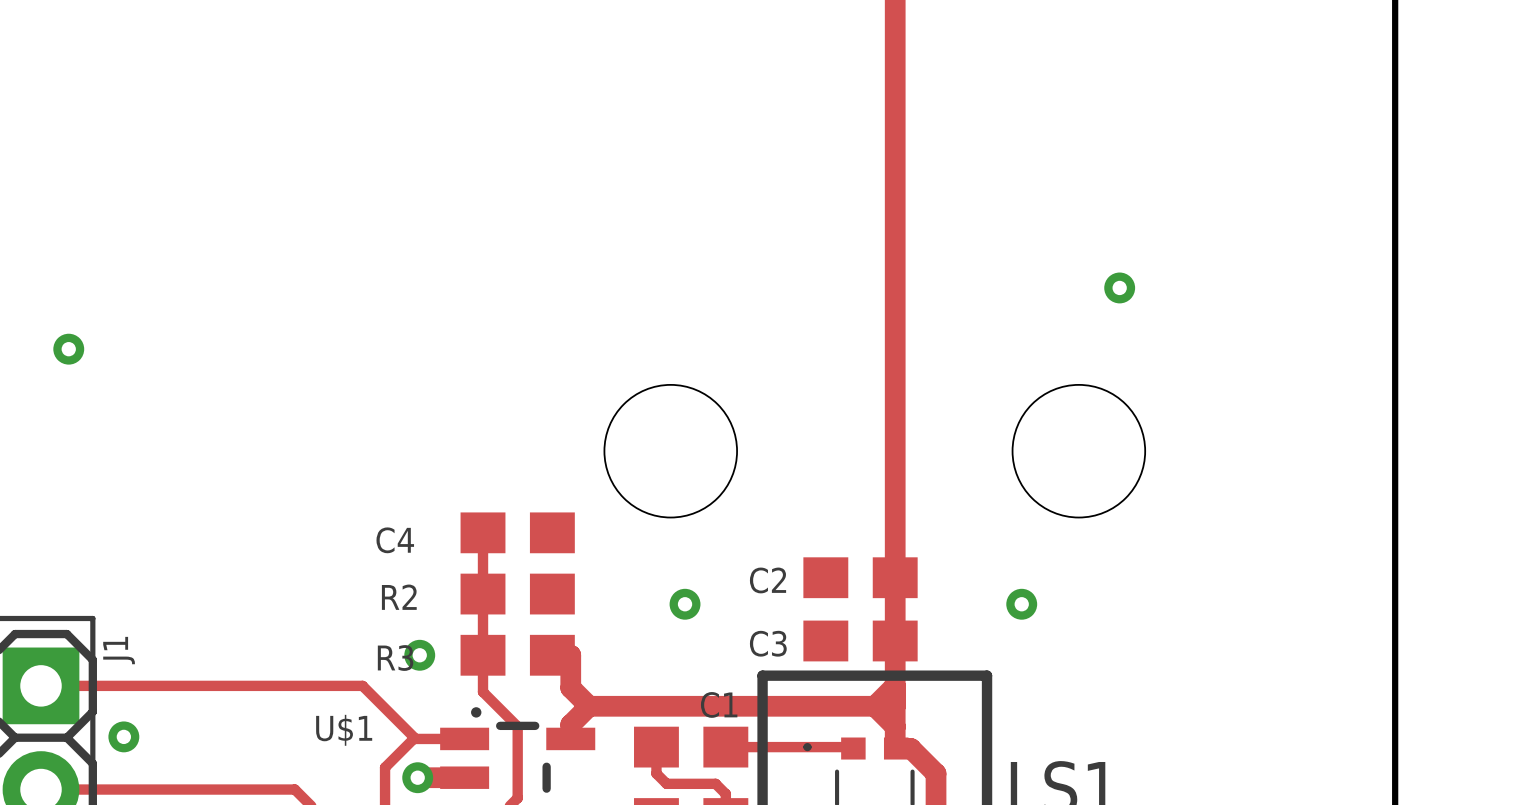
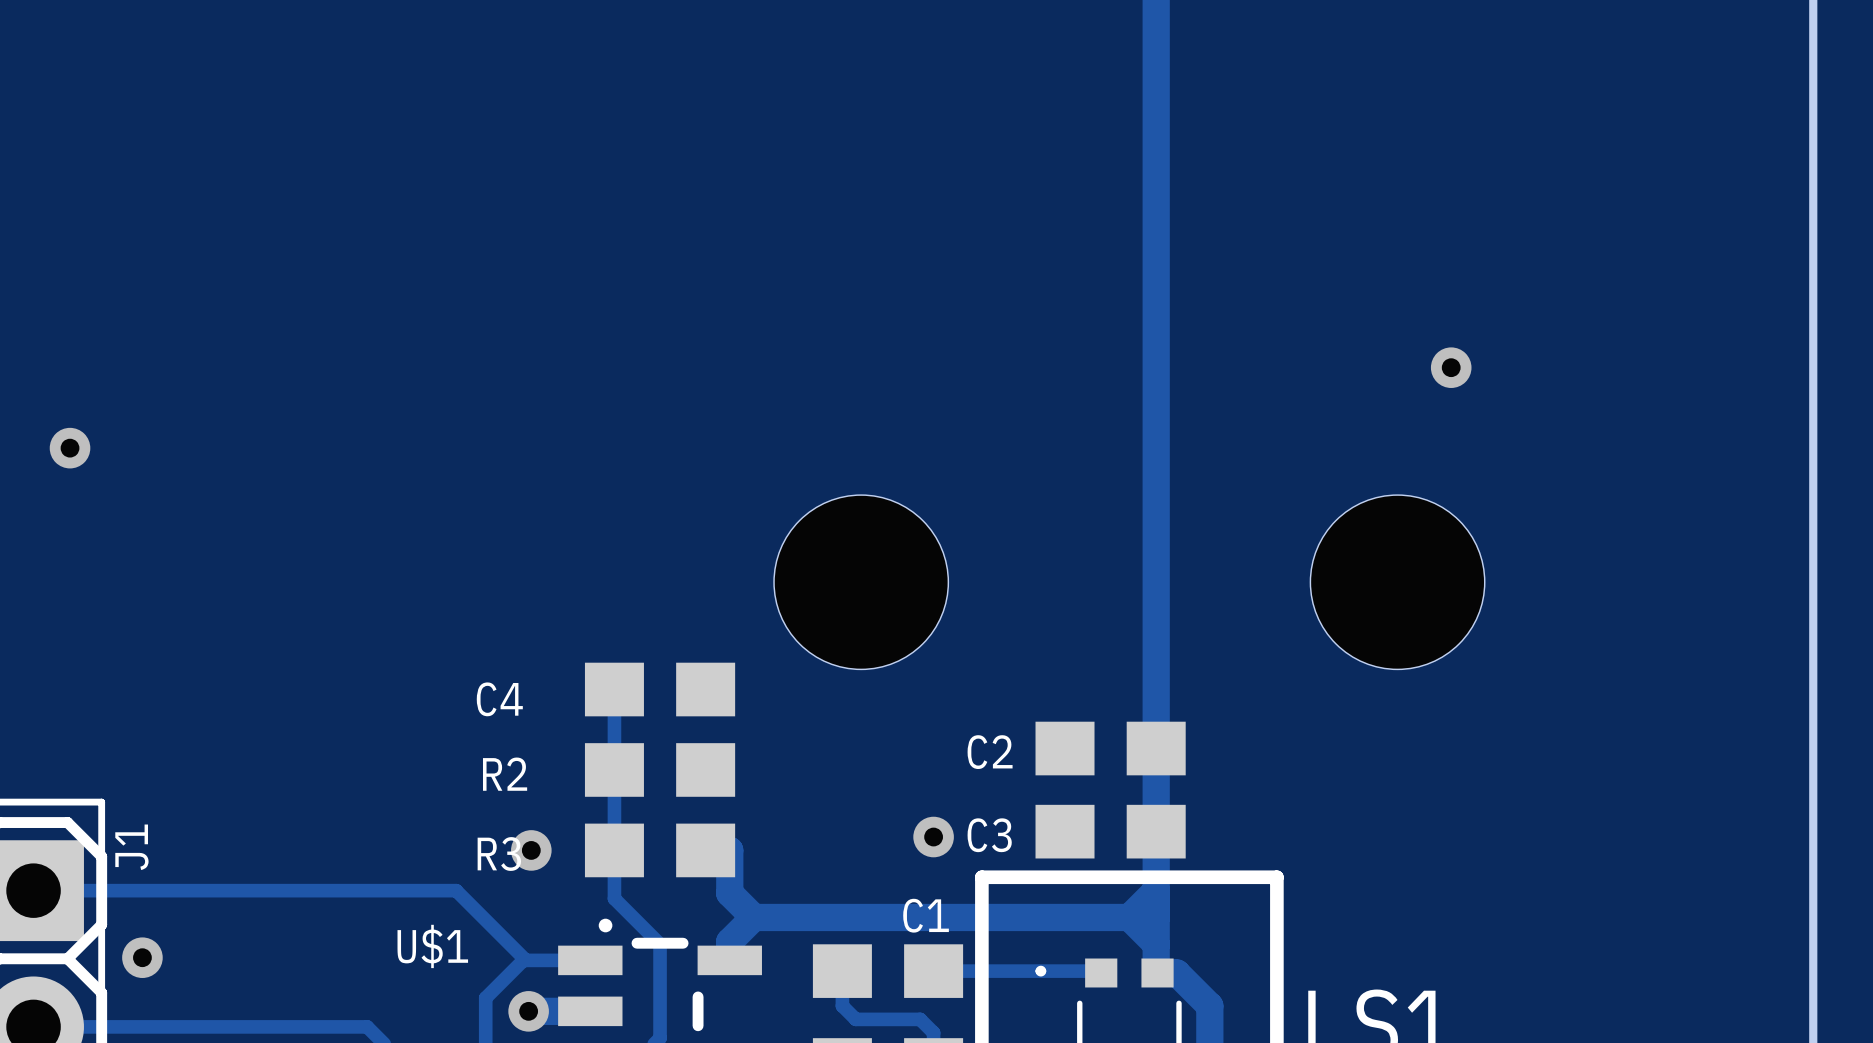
via position: (685, 604) -> (933, 837)
via: (1021, 604) -> none

